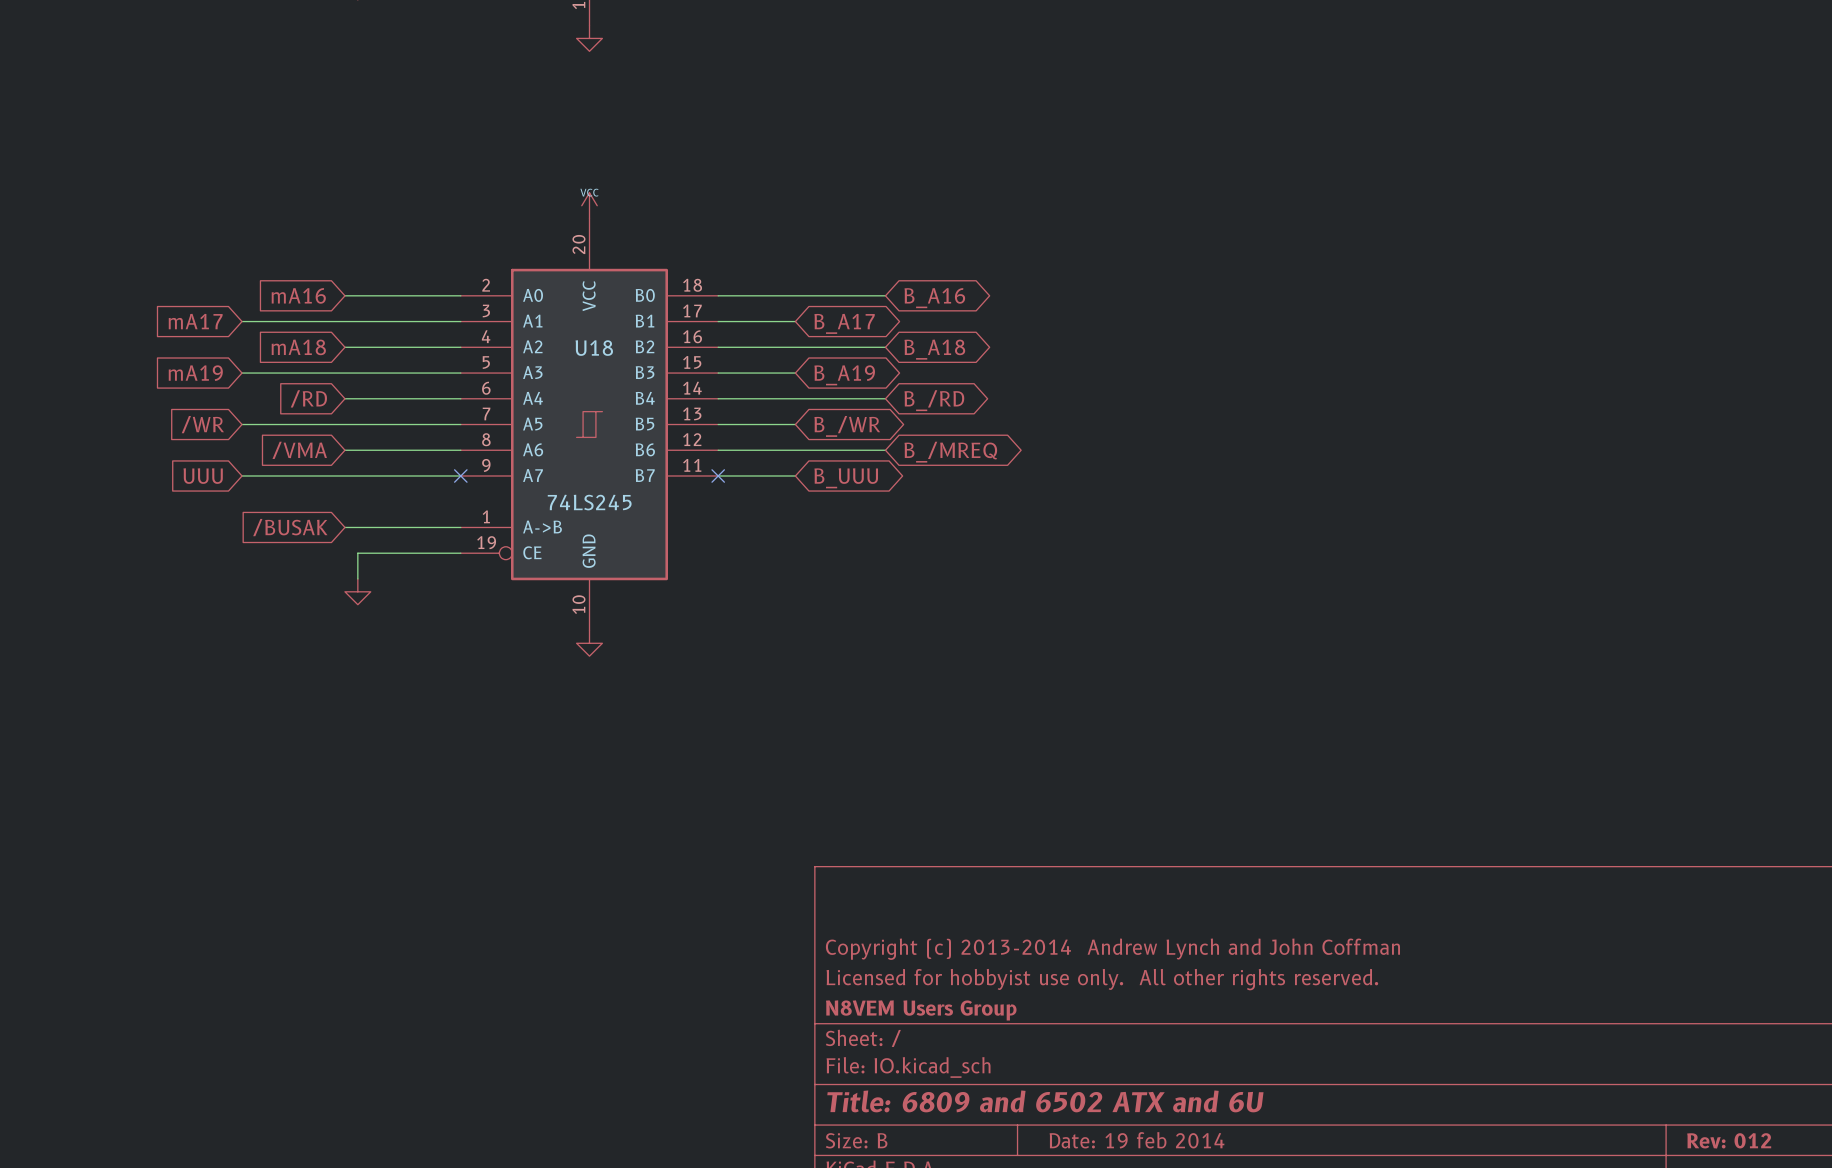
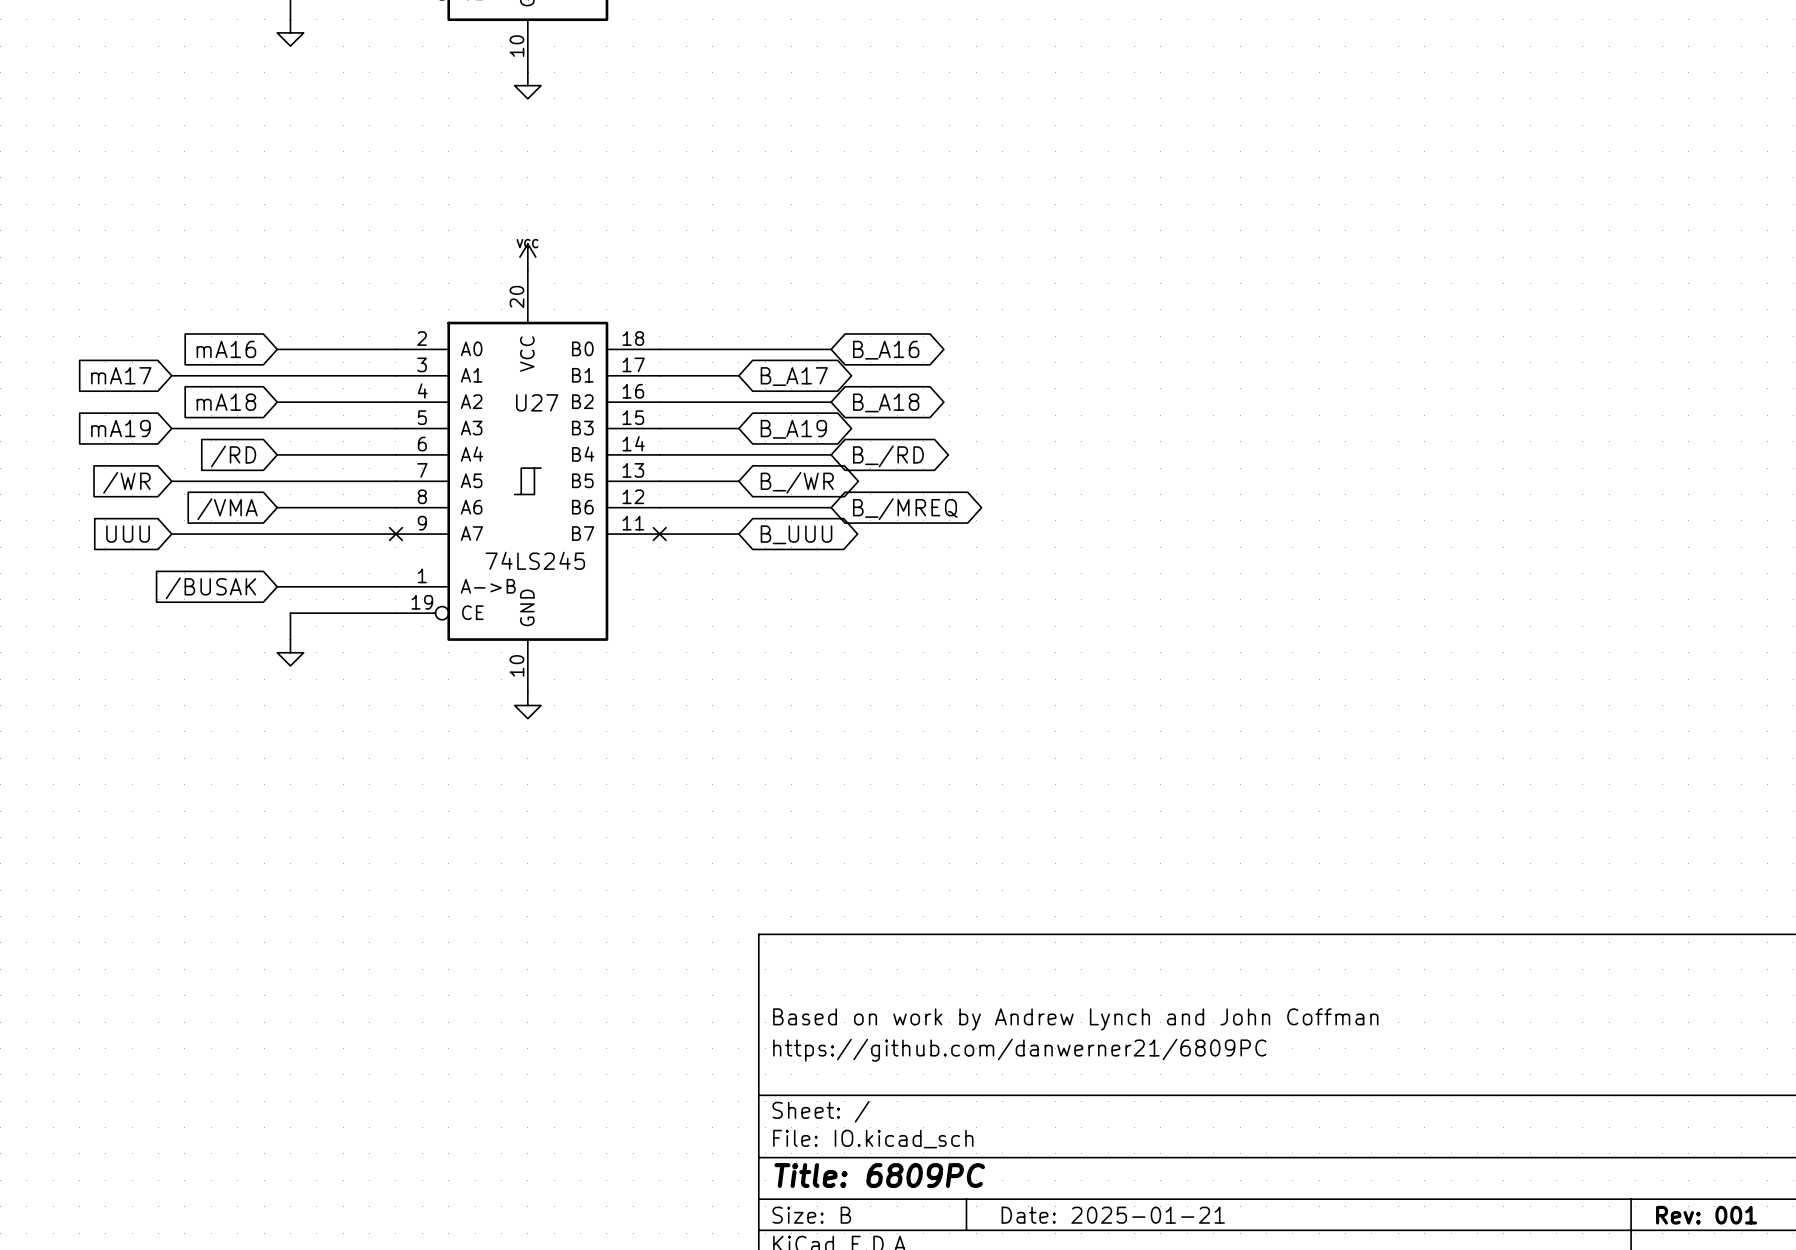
U18 name: U18 (594, 348) -> U27 (537, 402)
title block: Copyright (c) 2013-2014 Andrew Lynch and John Coffman (1112, 949) -> Based on work by Andrew Lynch and John Coffman (1075, 1019)
title block: Licensed for hobbyist use only. All other rights reserved. (1102, 979) -> https://github.com/danwerner21/6809PC (1019, 1050)
title block: N8VEM Users Group (921, 1010) -> none
title block: Title: 6809 and 6502 ATX and 6U (1045, 1101) -> Title: 6809PC (879, 1175)
title block: Date: 19 feb 2014 (1137, 1140) -> Date: 2025-01-21 (1113, 1215)
title block: Rev: 012 (1729, 1140) -> Rev: 001 (1706, 1215)

